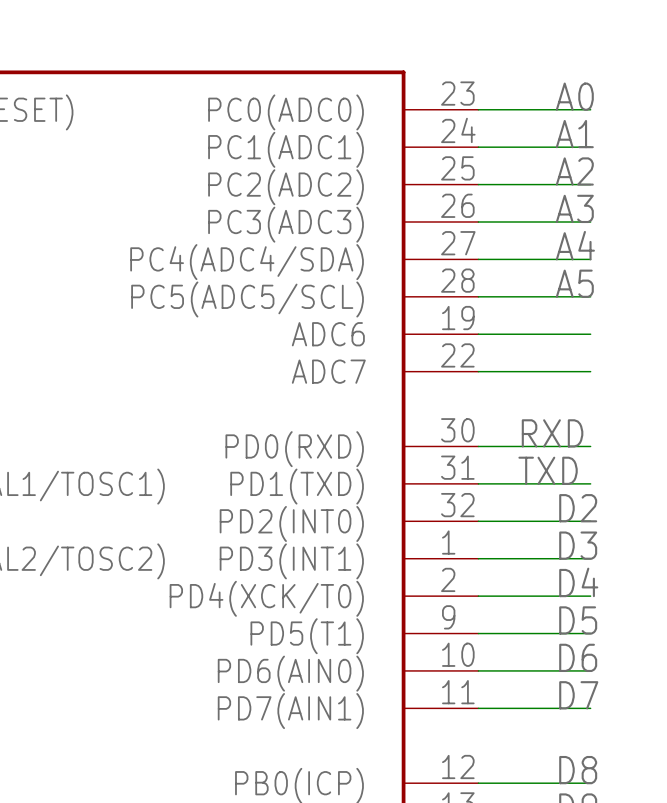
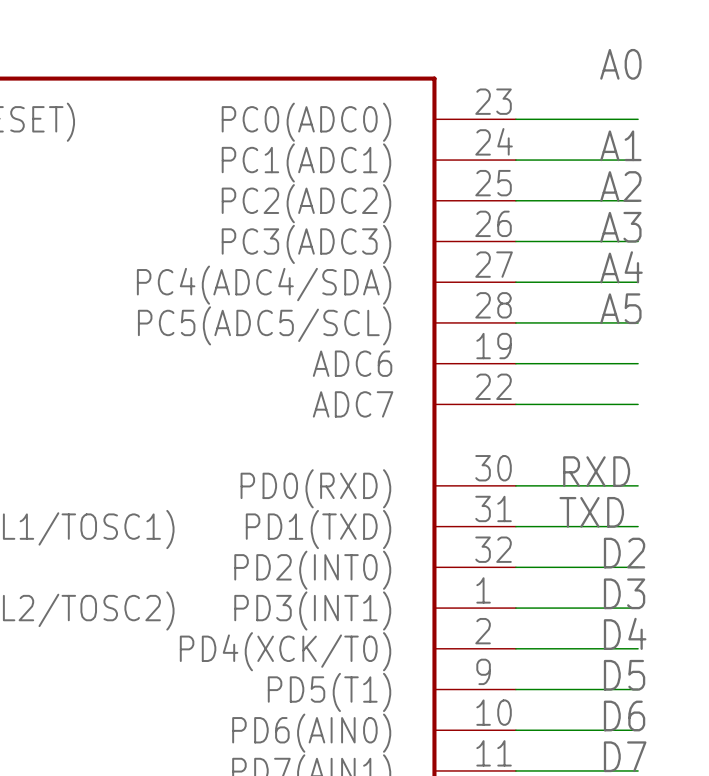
label position: A0 (574, 96) -> A0 (620, 64)

